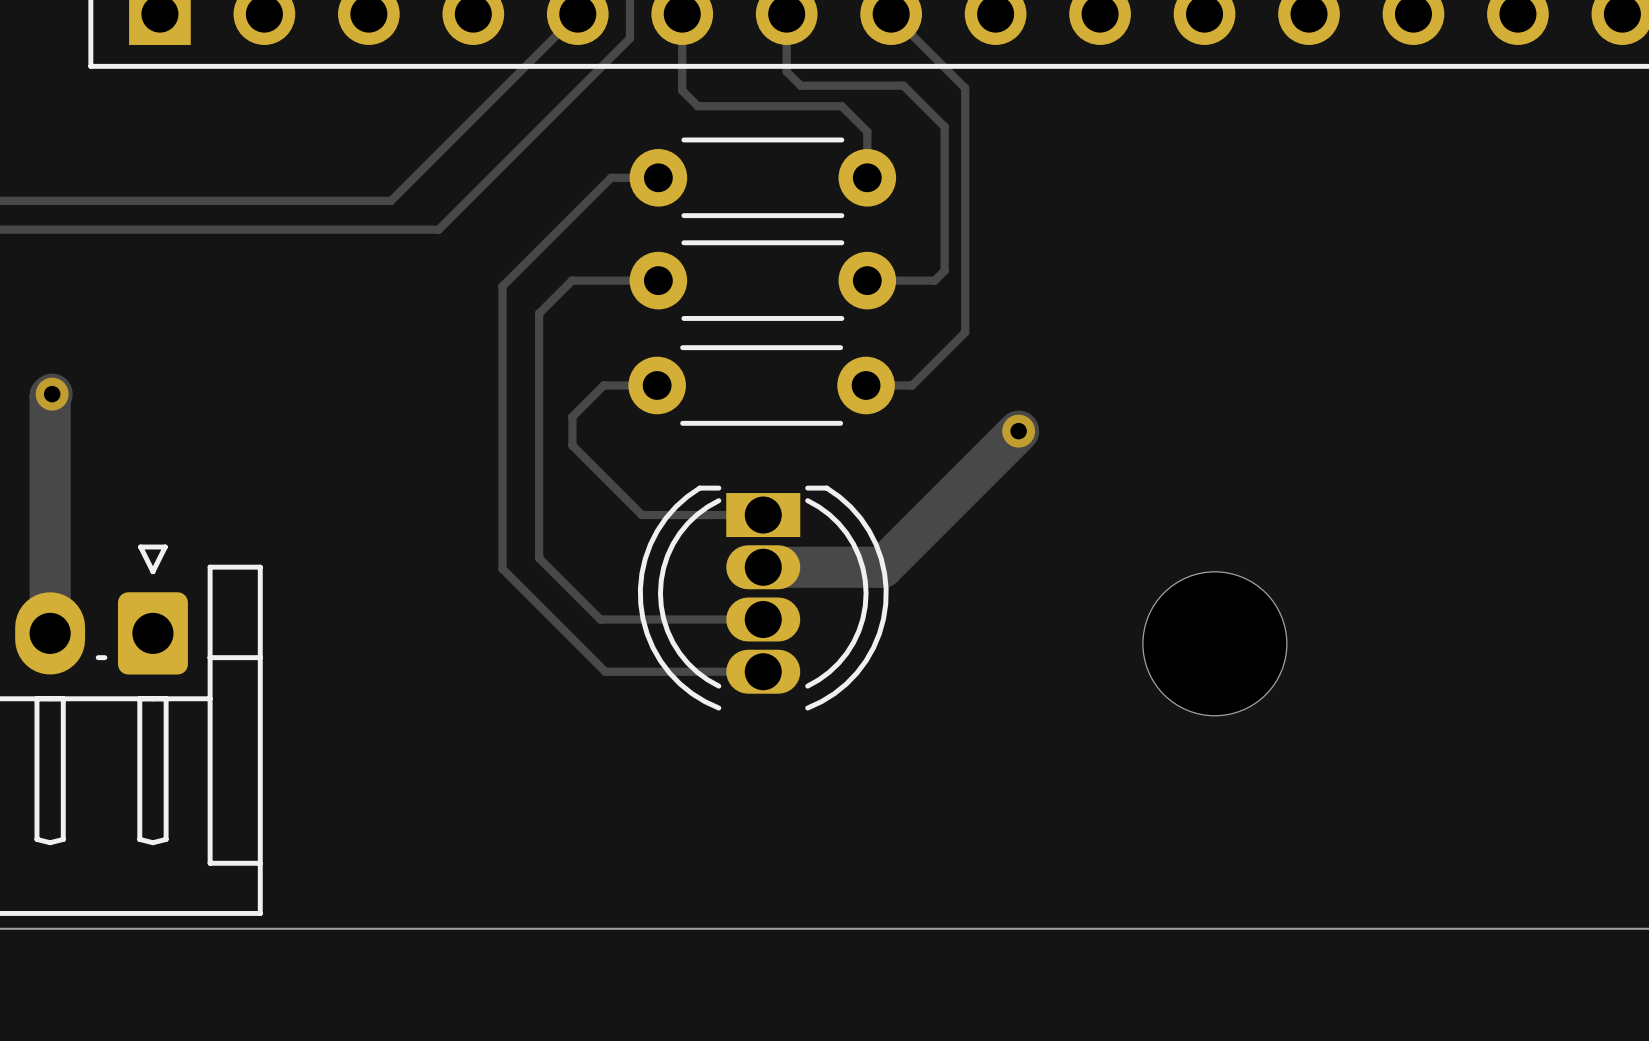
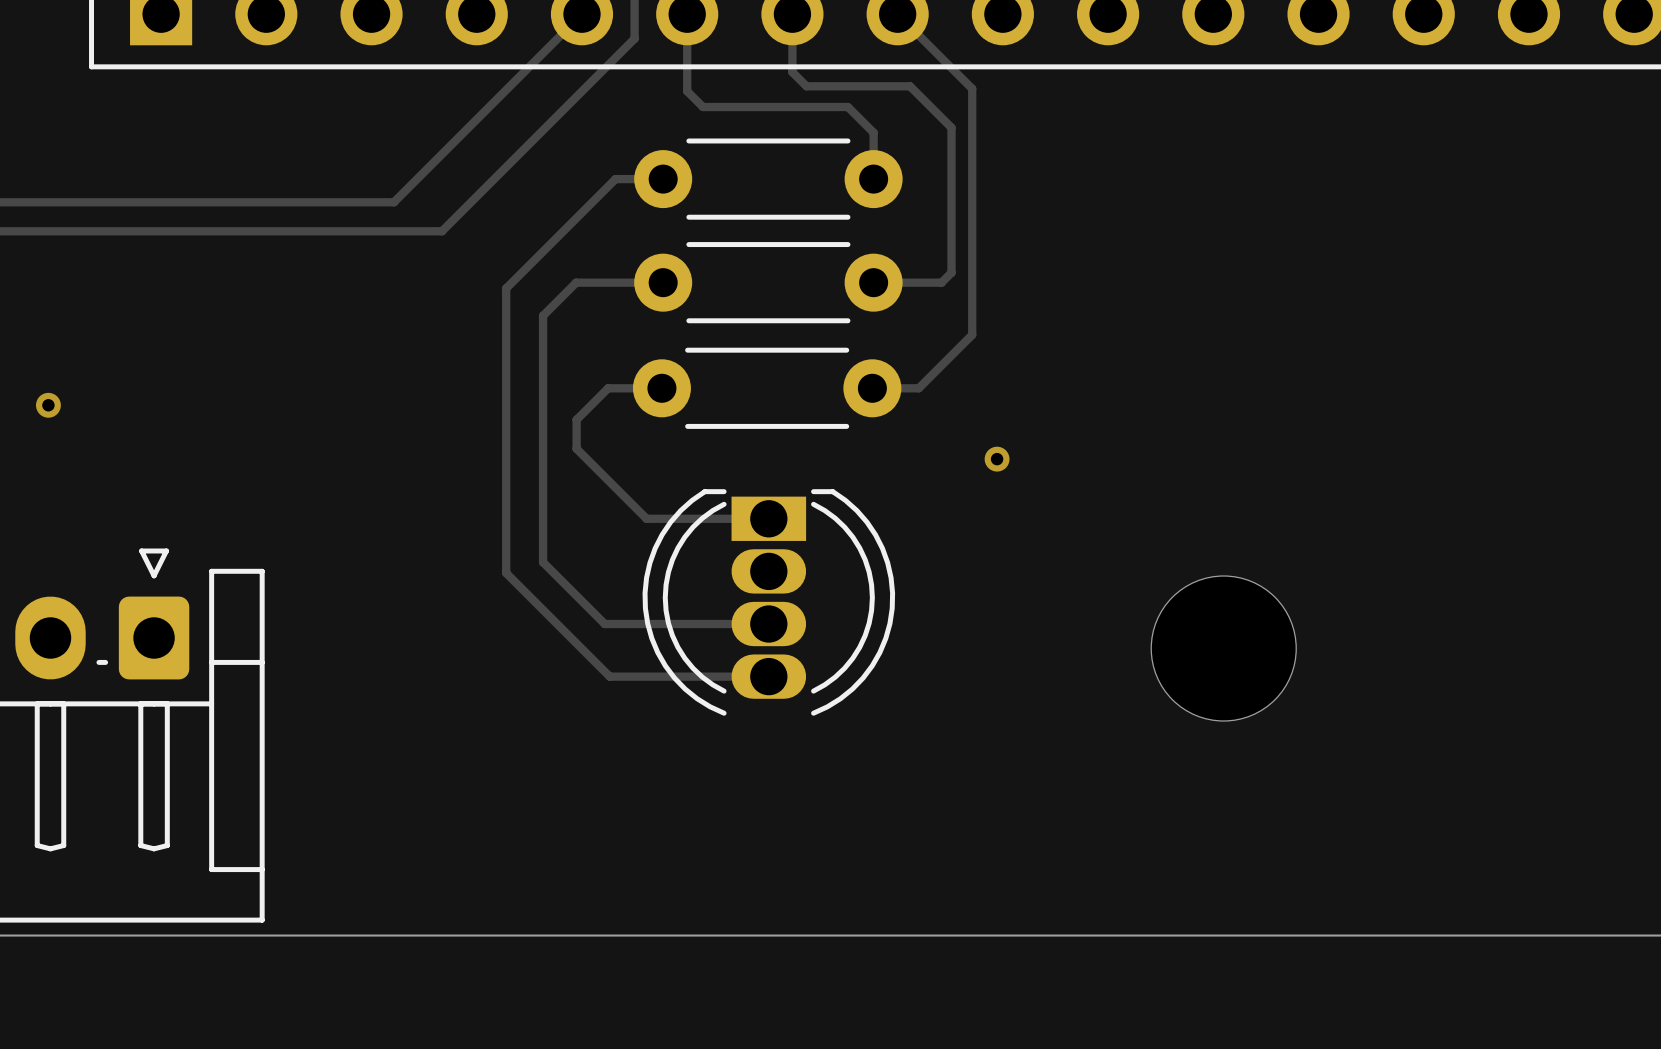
via size: [35, 377, 69, 411] -> [35, 392, 61, 418]
track: (52, 394) (50, 396) (50, 633) -> none
track: (1018, 431) (882, 567) (763, 567) -> none
via position: (1018, 431) -> (997, 459)

